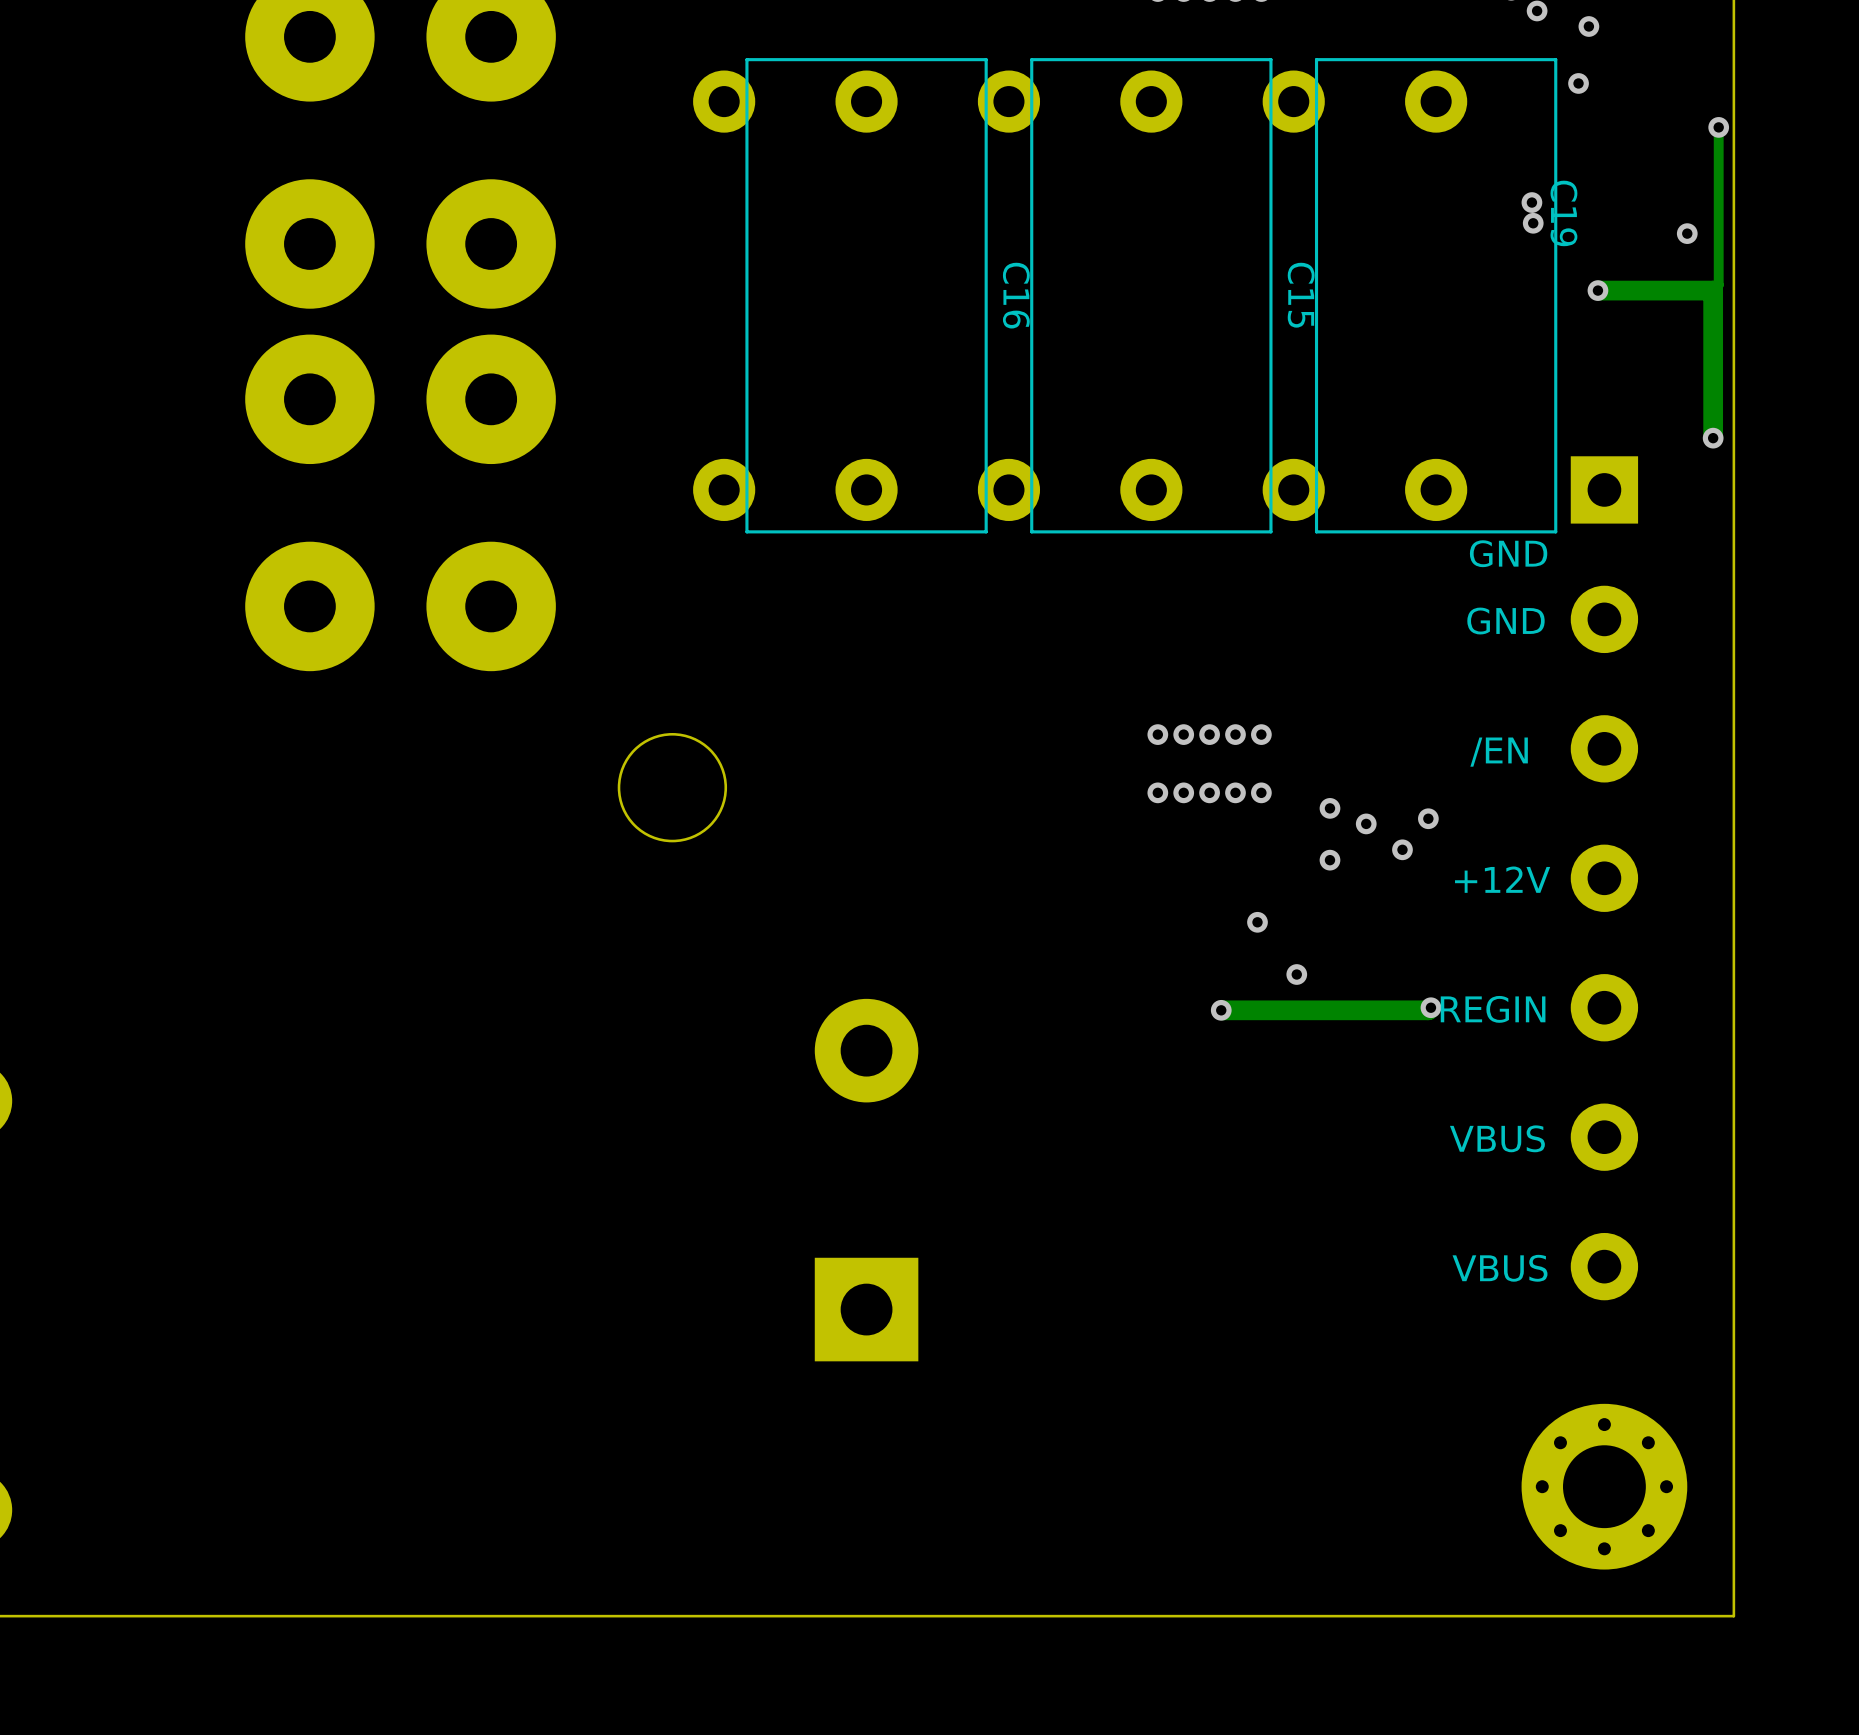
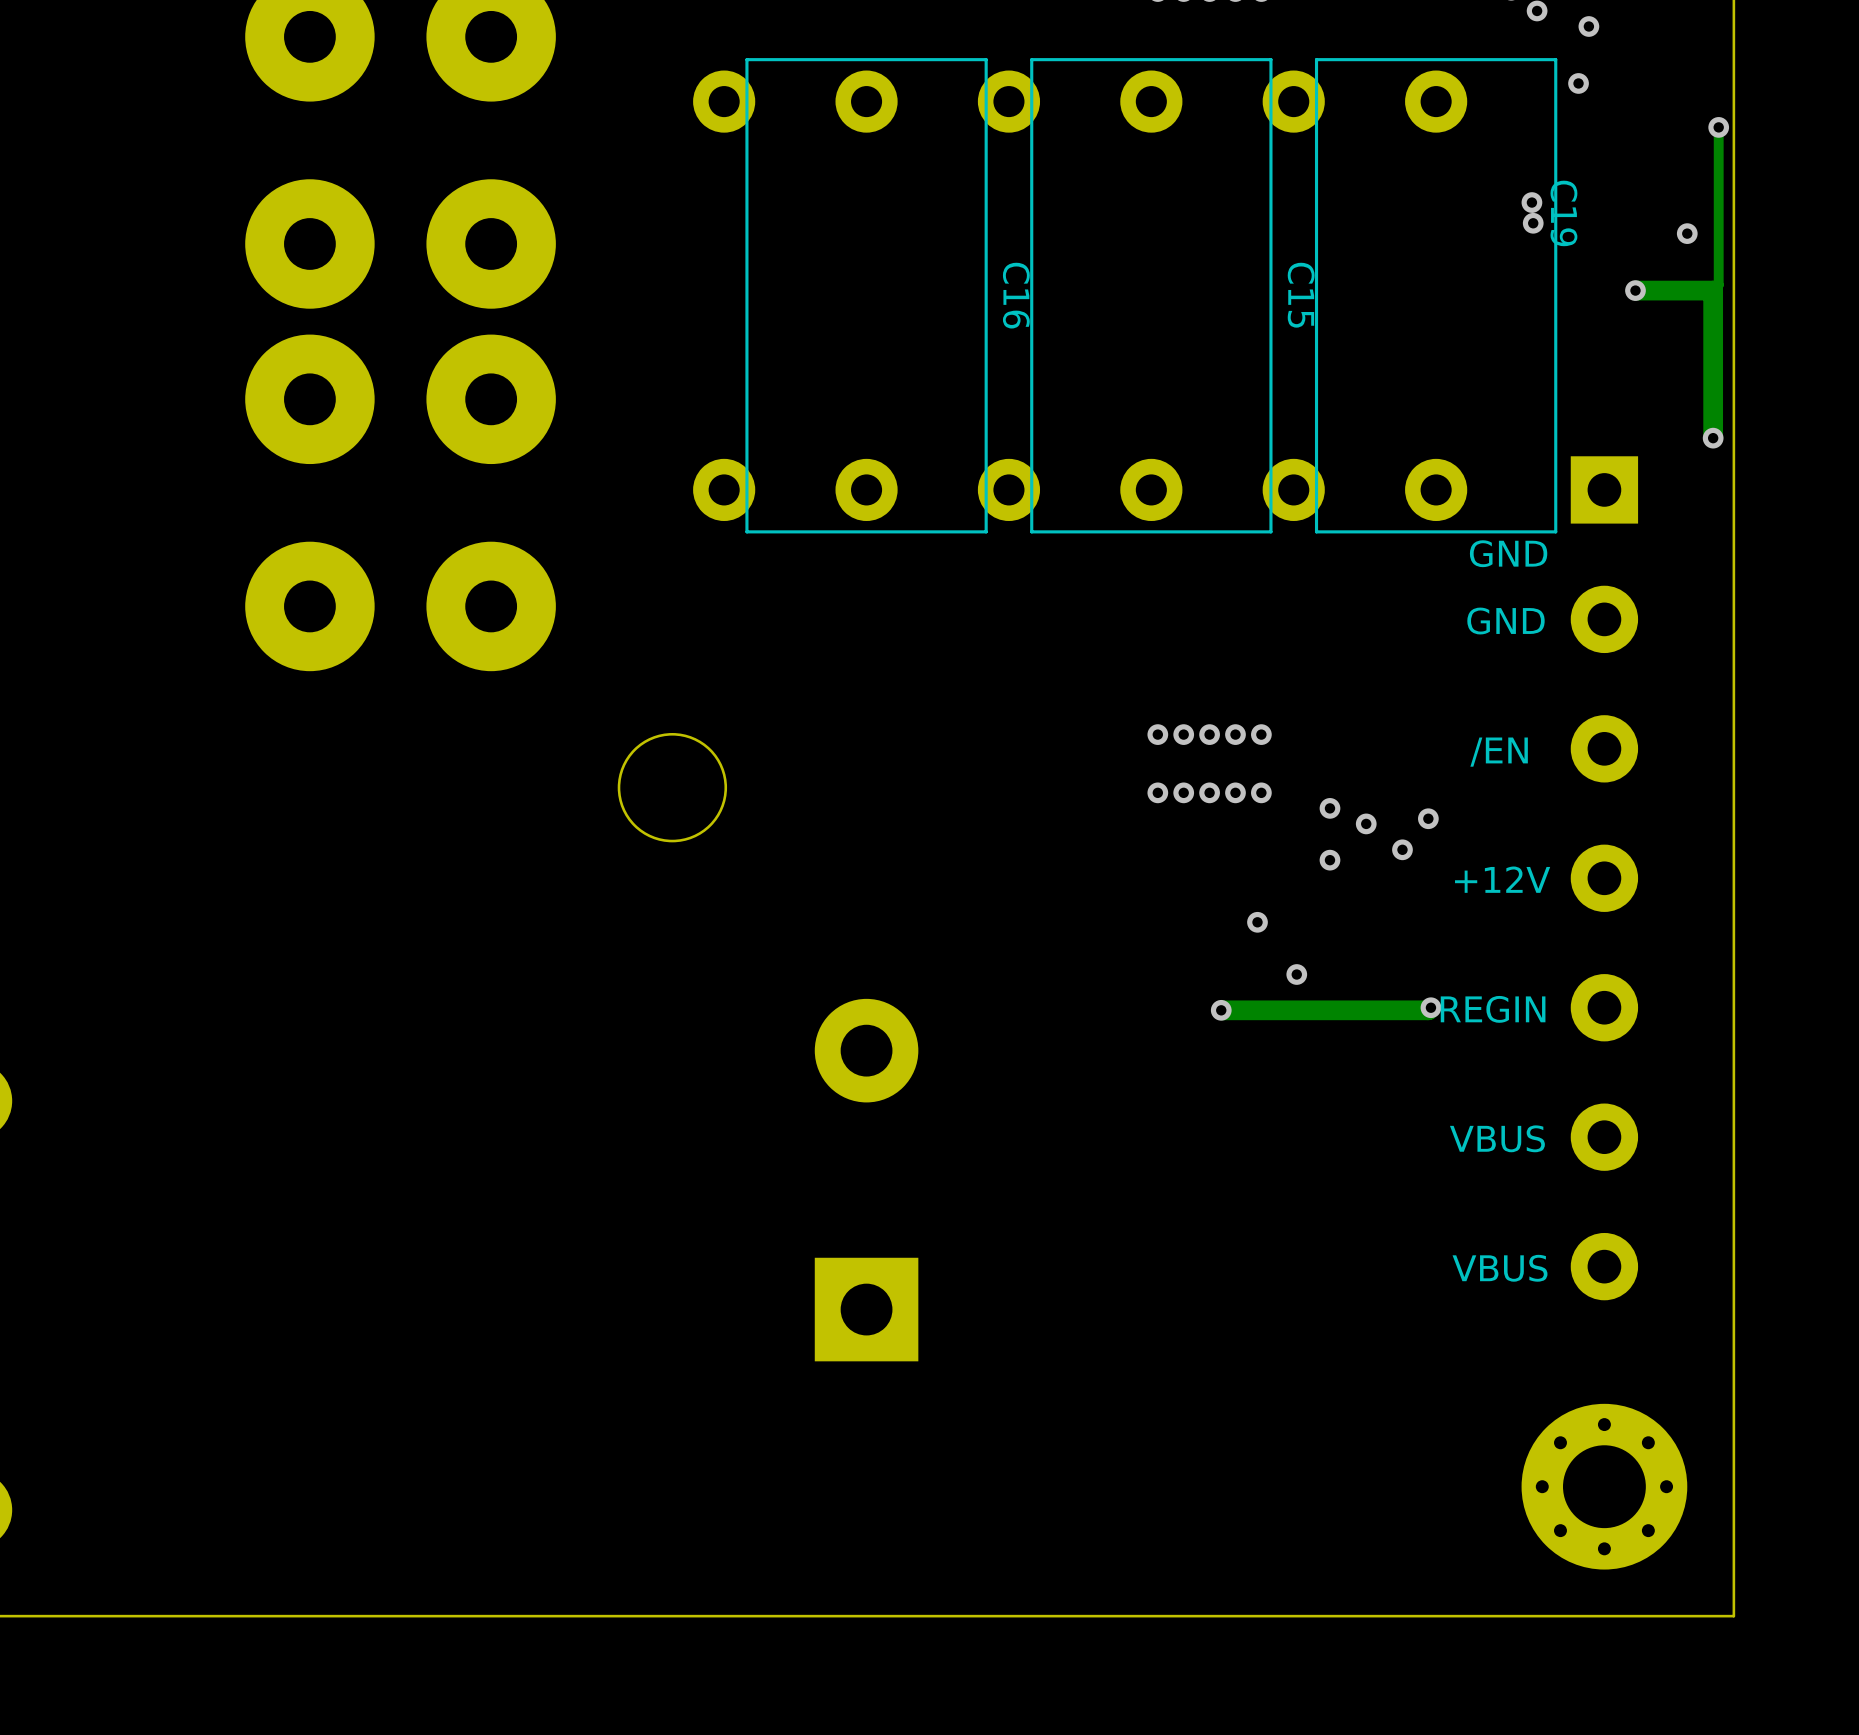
via position: (1597, 290) -> (1635, 290)
track: (1635, 290) (1597, 290) -> none

